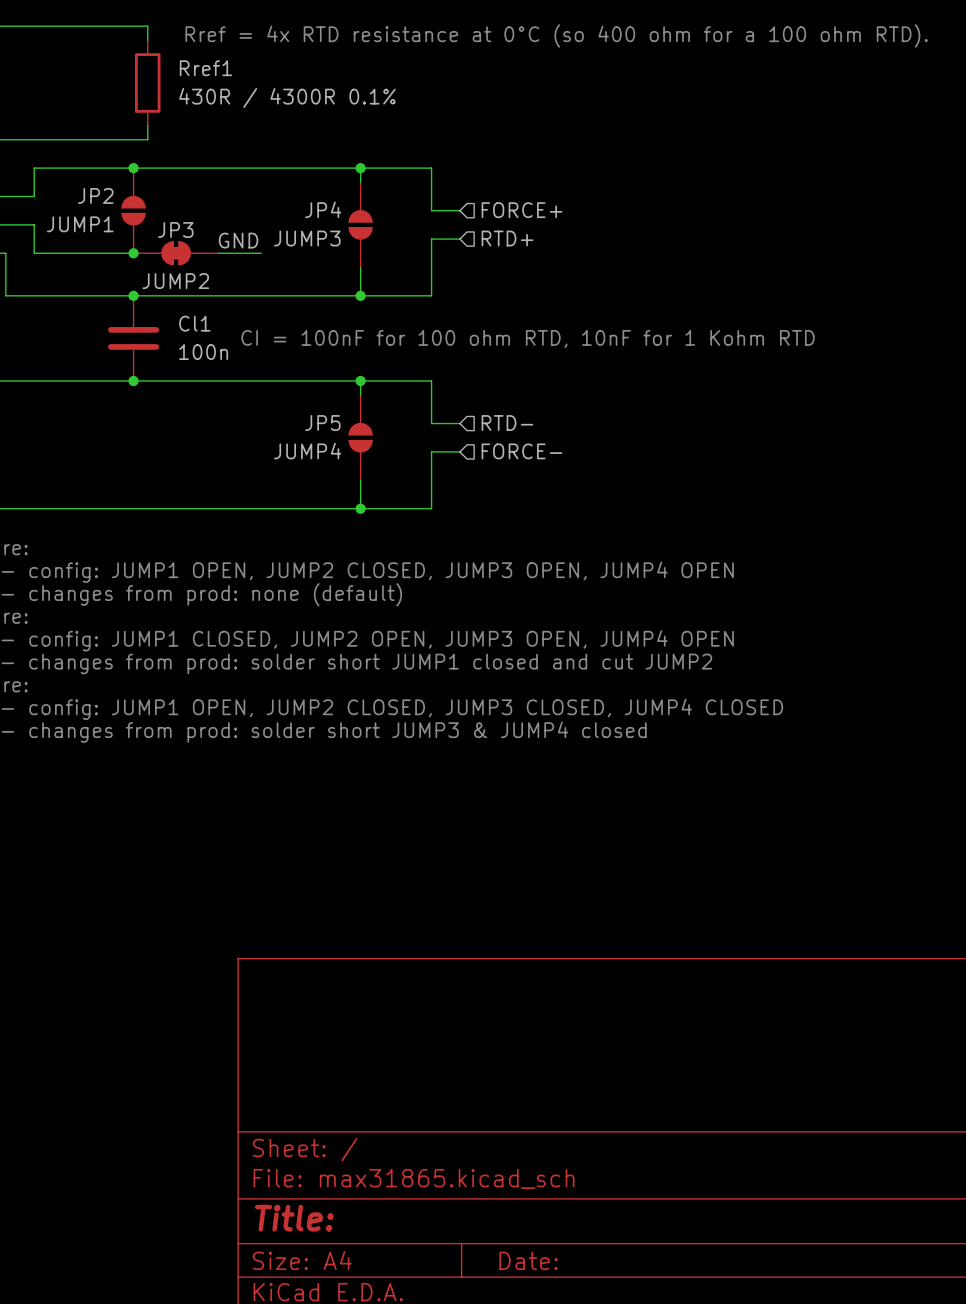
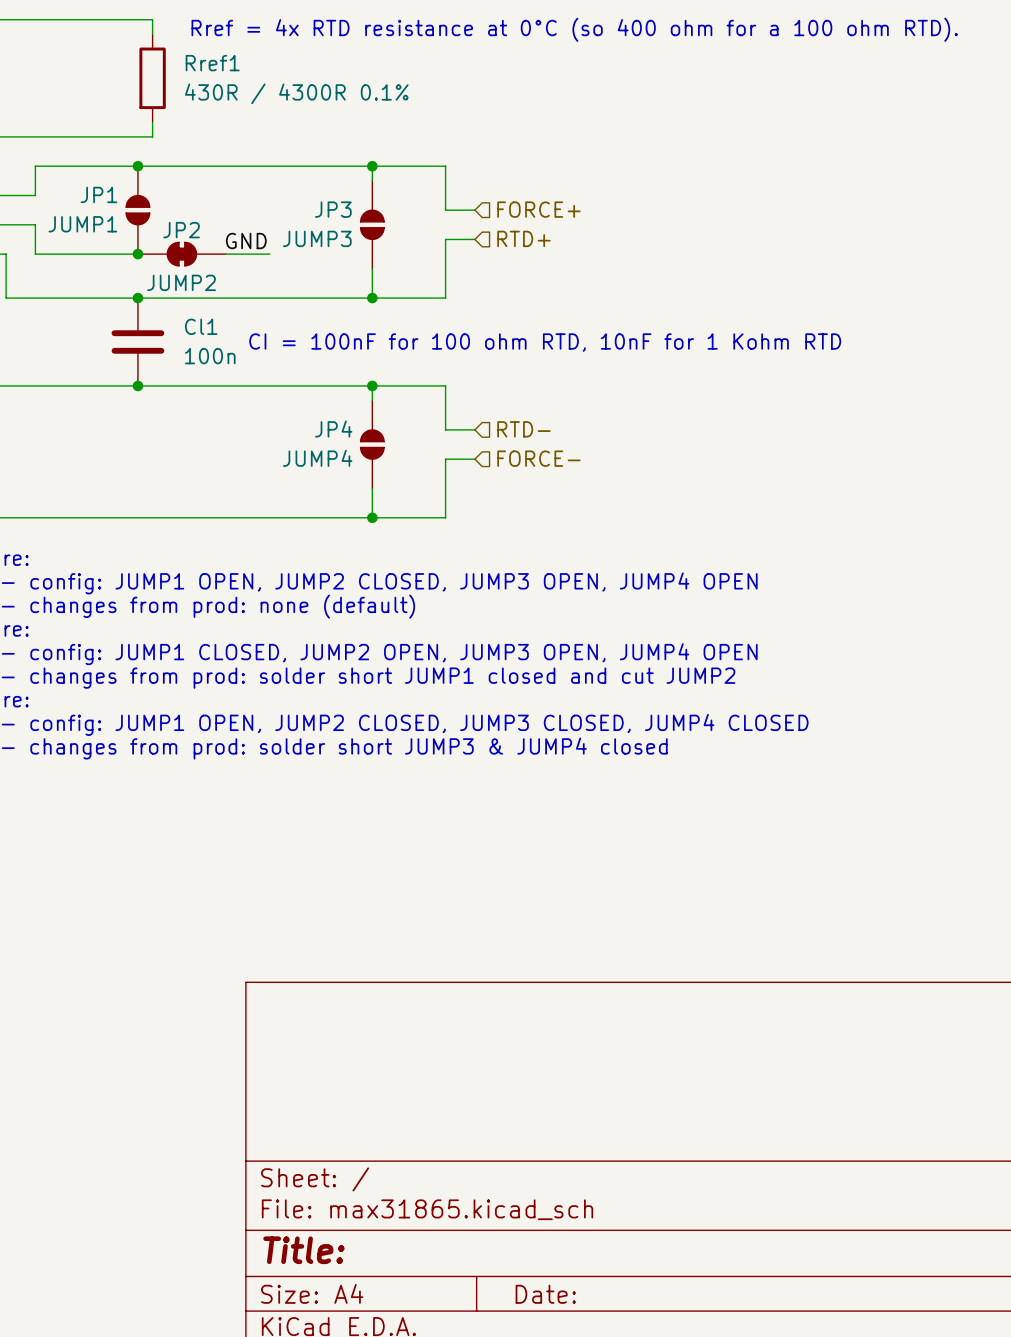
JP2 name: JP2 (95, 195) -> JP1 (98, 194)
JP4 name: JP4 (323, 209) -> JP3 (333, 209)
JP3 name: JP3 (175, 230) -> JP2 (181, 230)
JP5 name: JP5 (322, 423) -> JP4 (333, 429)

